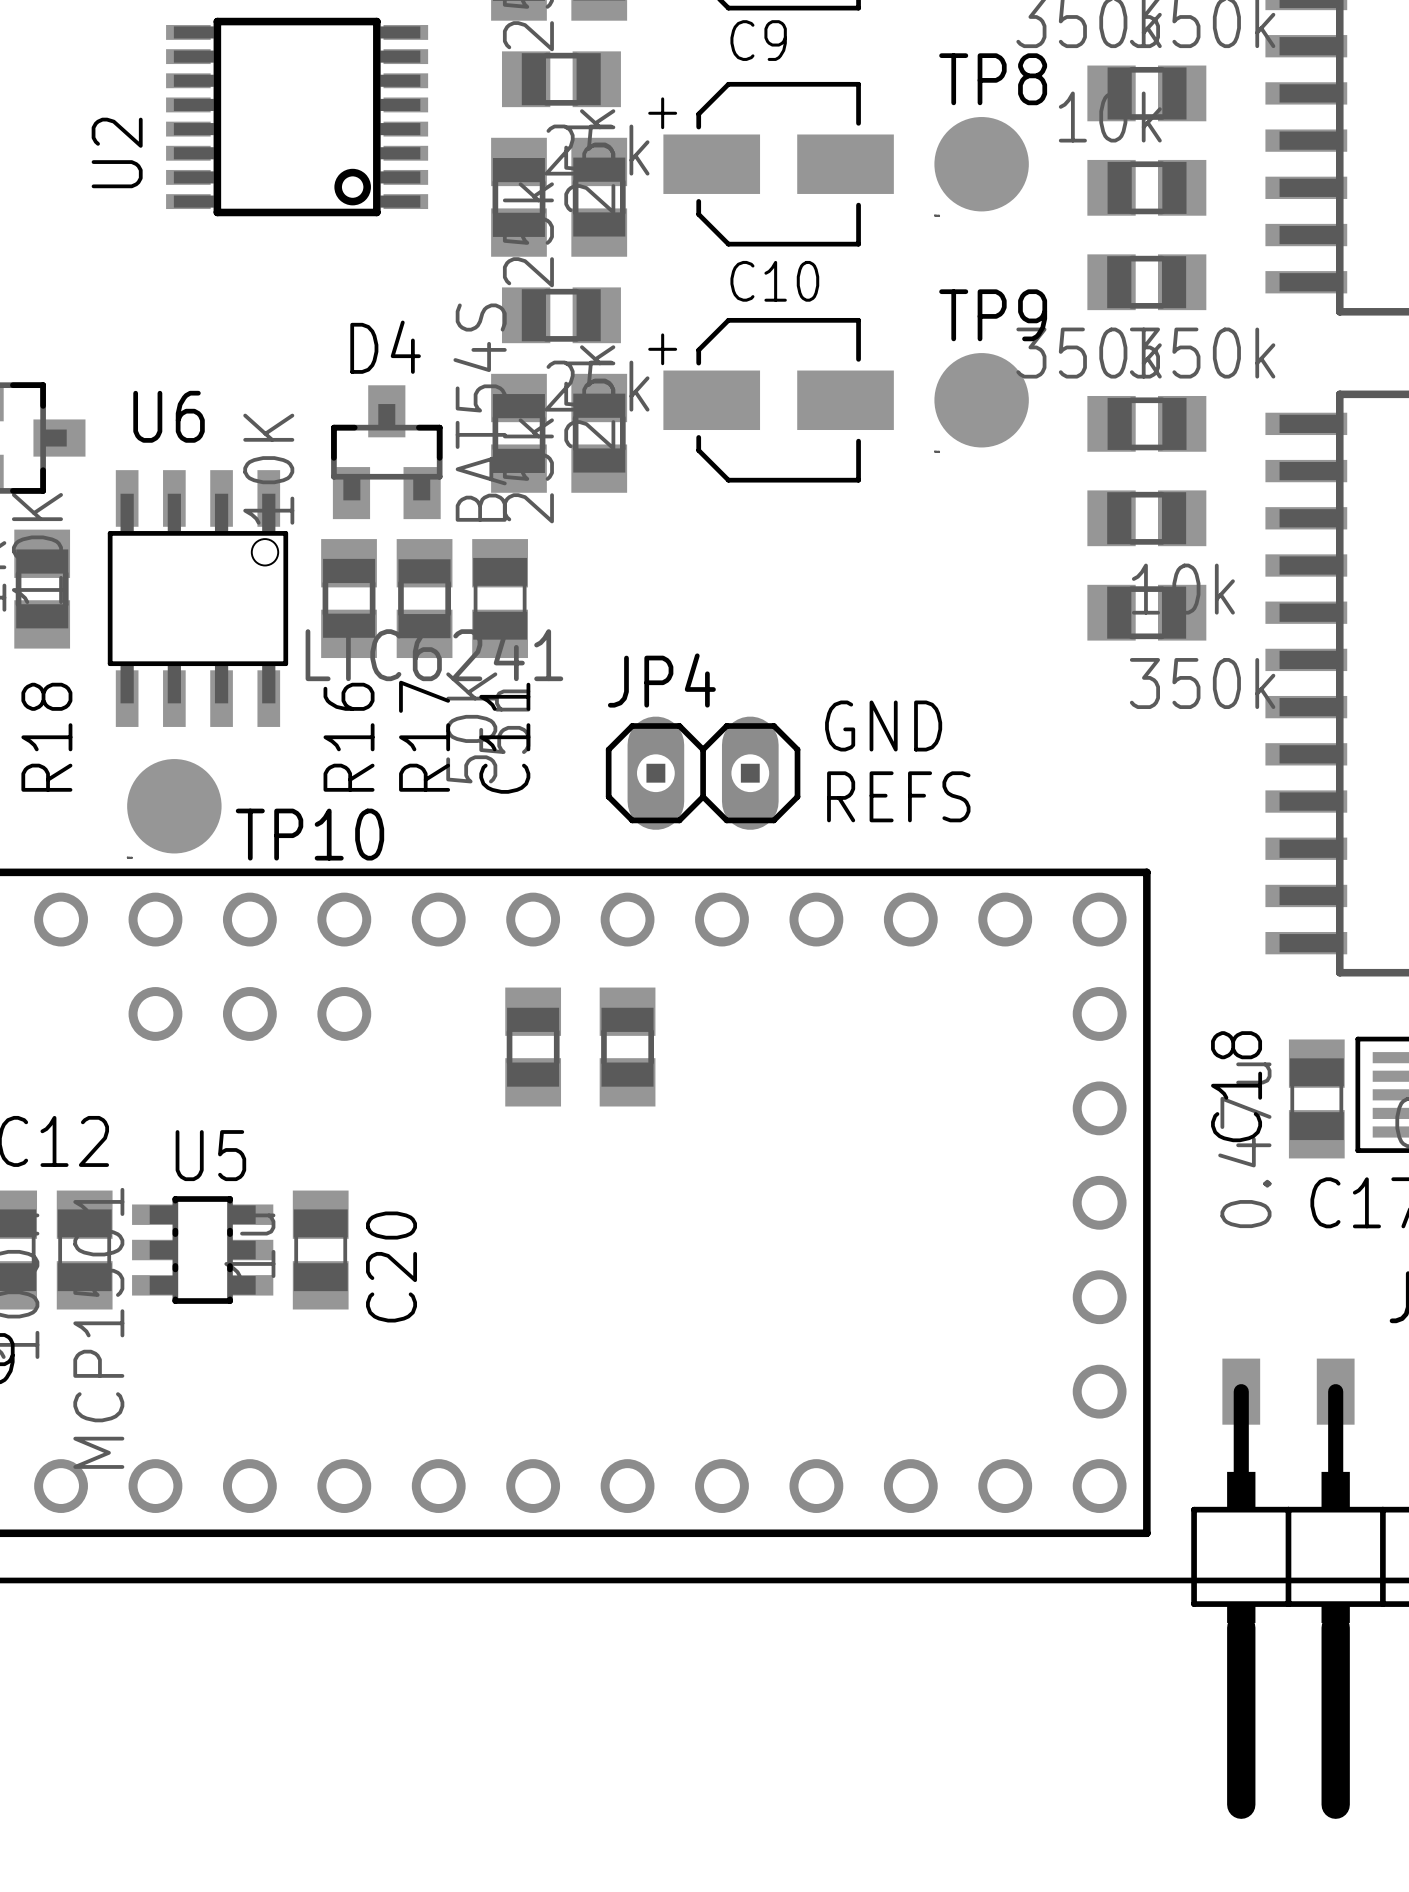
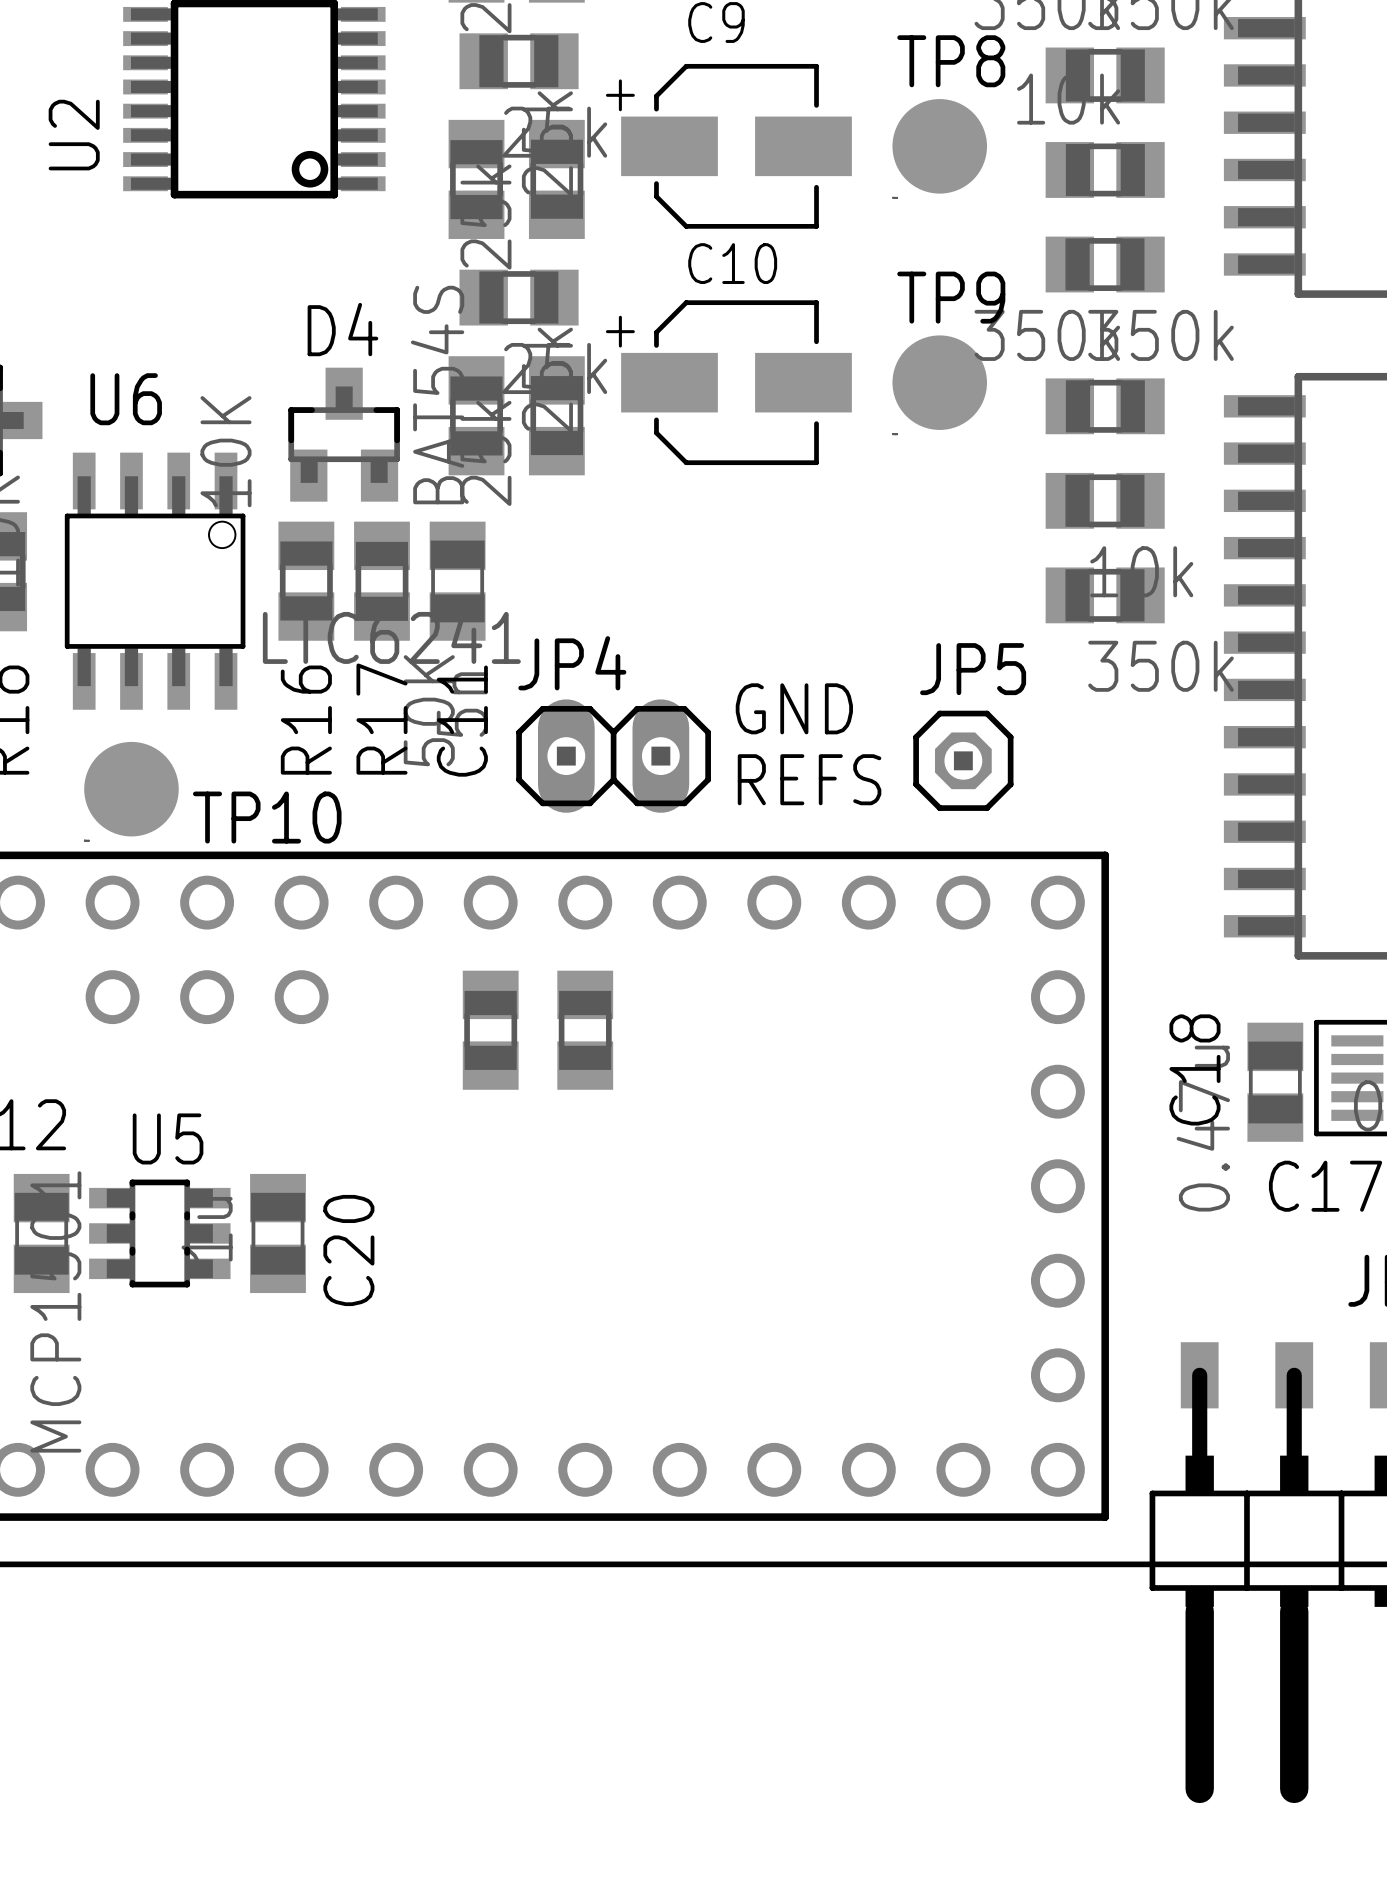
text position: GND (883, 726) -> GND (794, 708)
JP4 position: (703, 773) -> (613, 756)
JP5: none -> (963, 760)
text position: REFS (898, 796) -> REFS (809, 779)

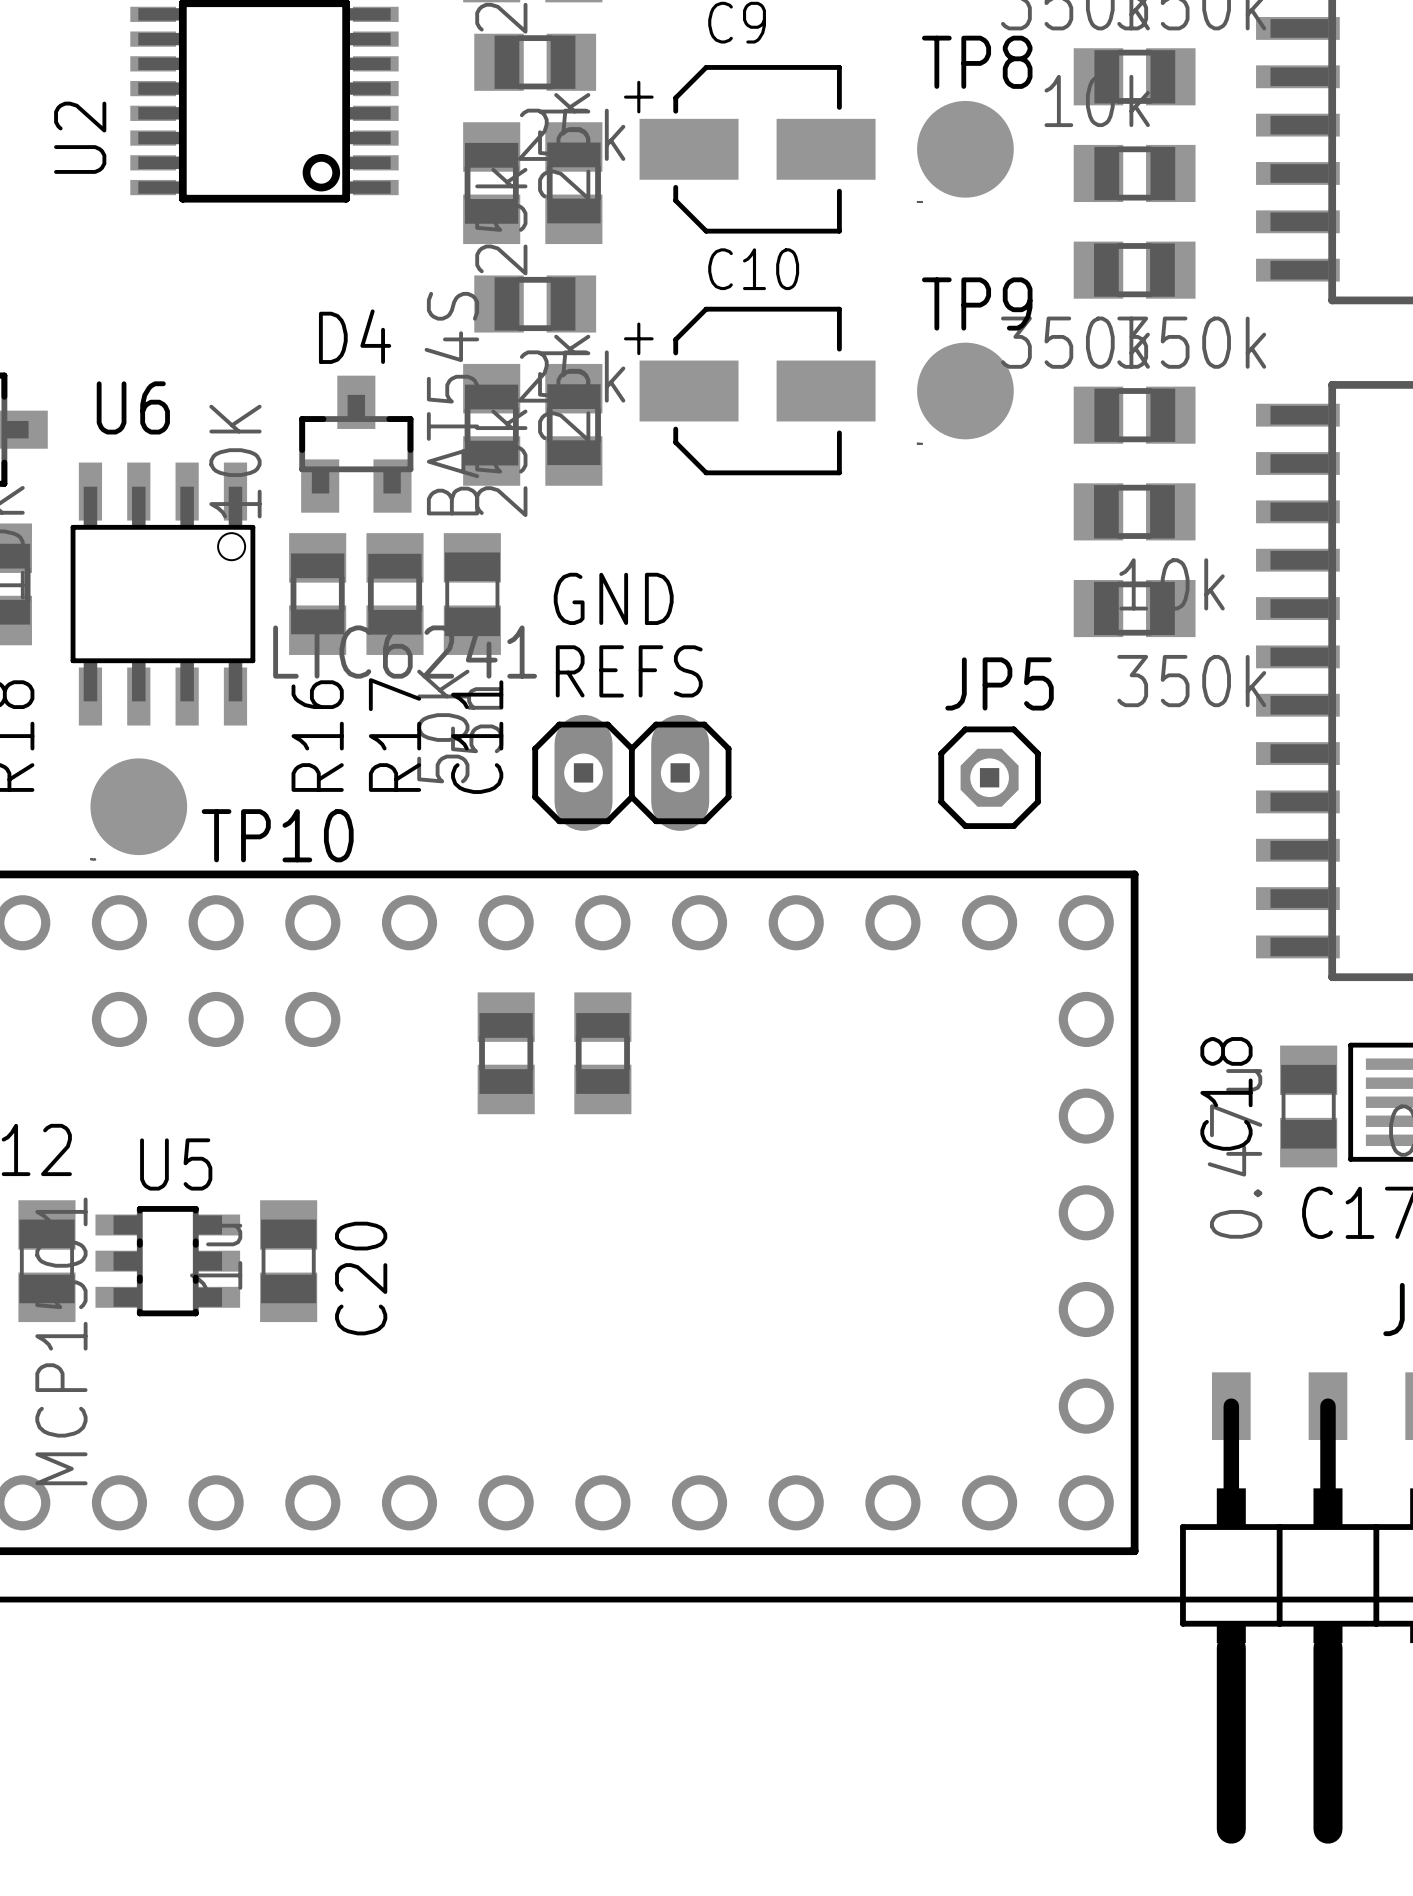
JP4 name: JP4 (572, 663) -> none
text position: GND (794, 708) -> GND (613, 598)
text position: REFS (809, 779) -> REFS (629, 671)

